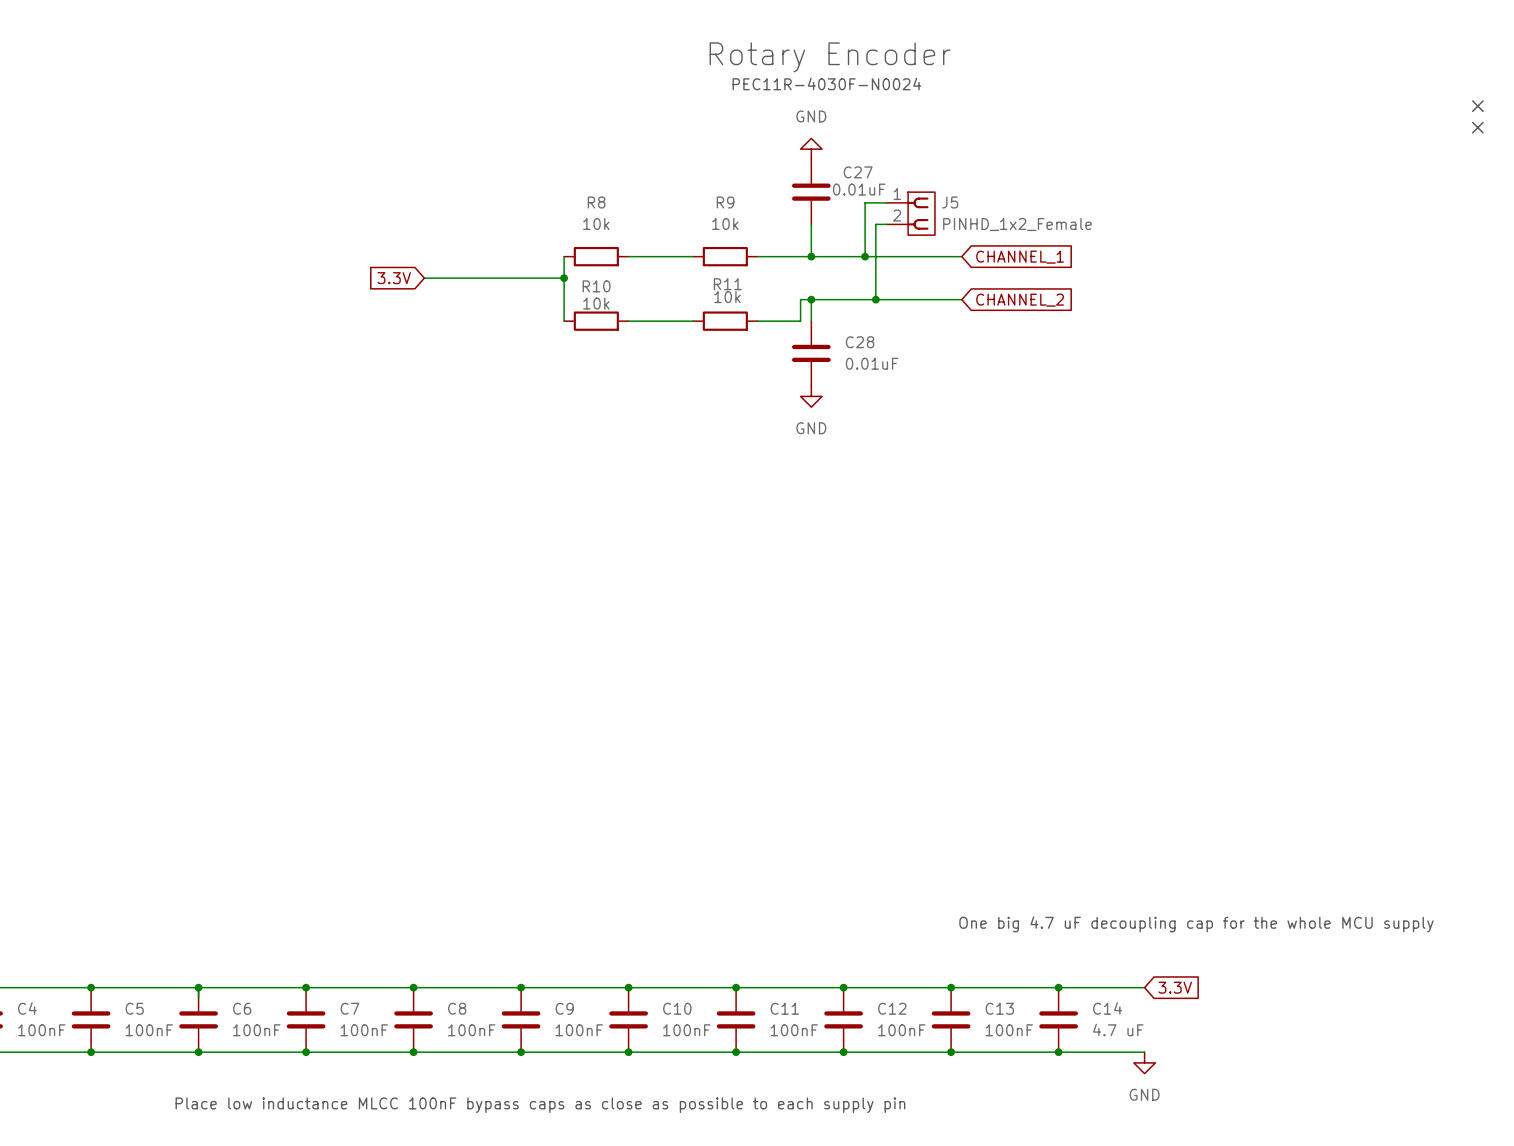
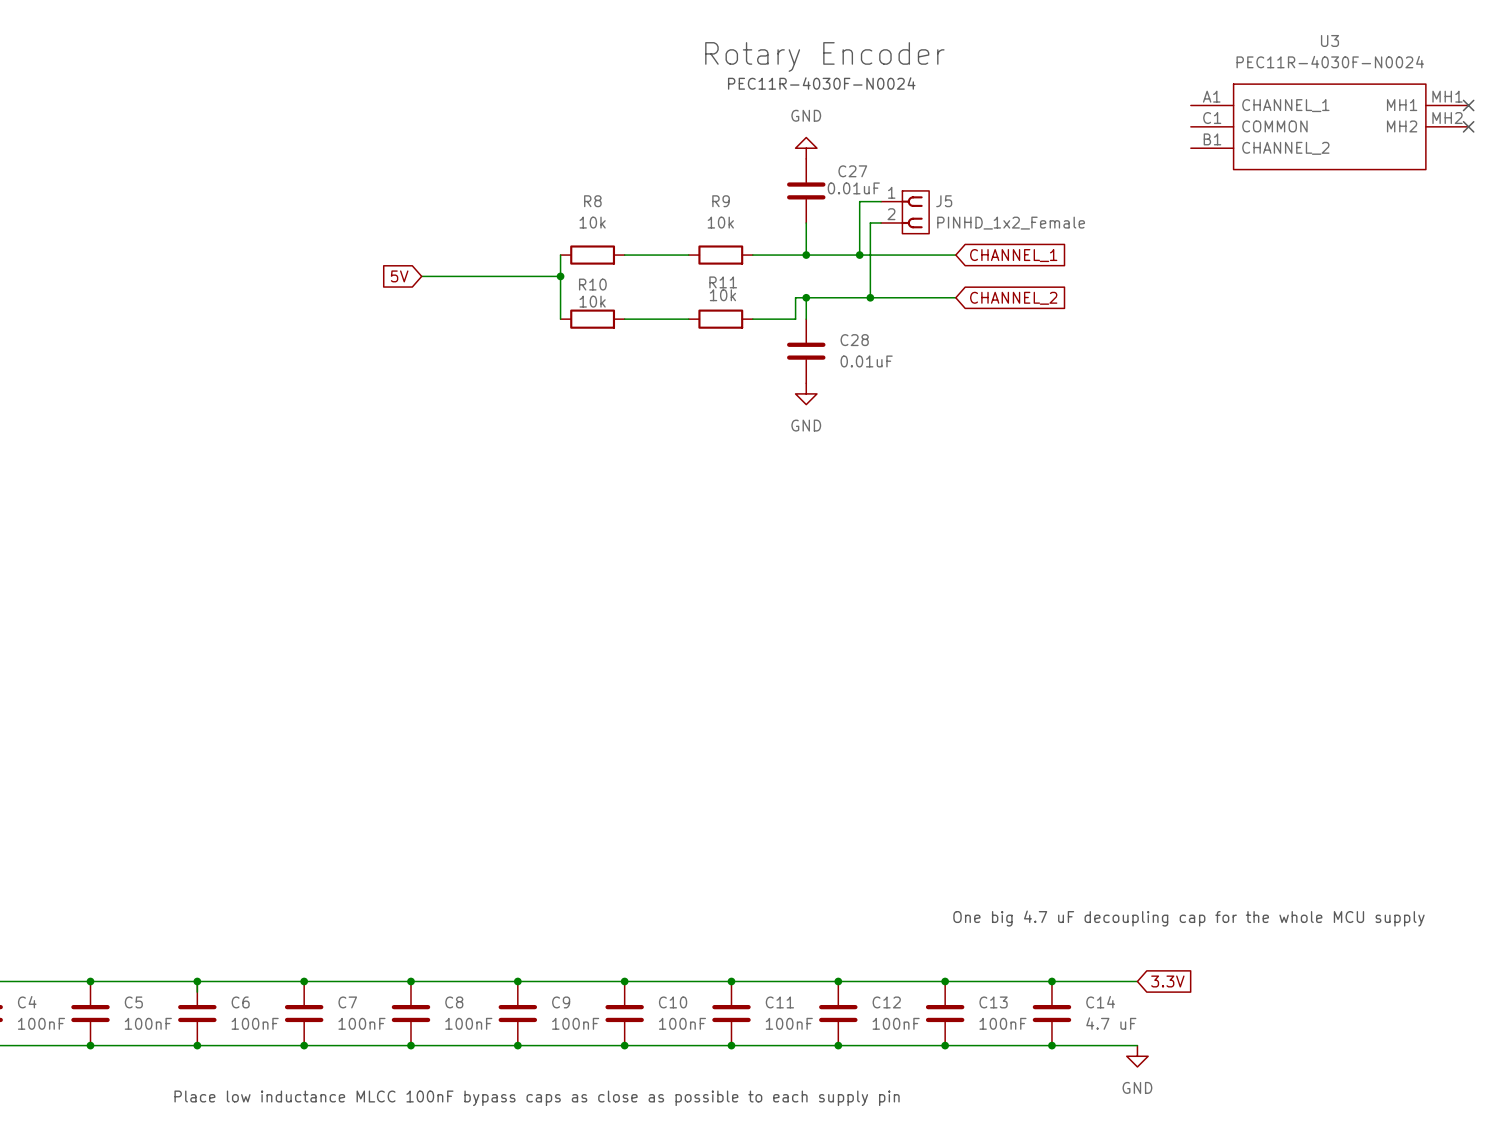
U3: none -> PEC11R-4030F-N0024 (1329, 126)
global label: 3.3V (394, 278) -> 5V (399, 276)

